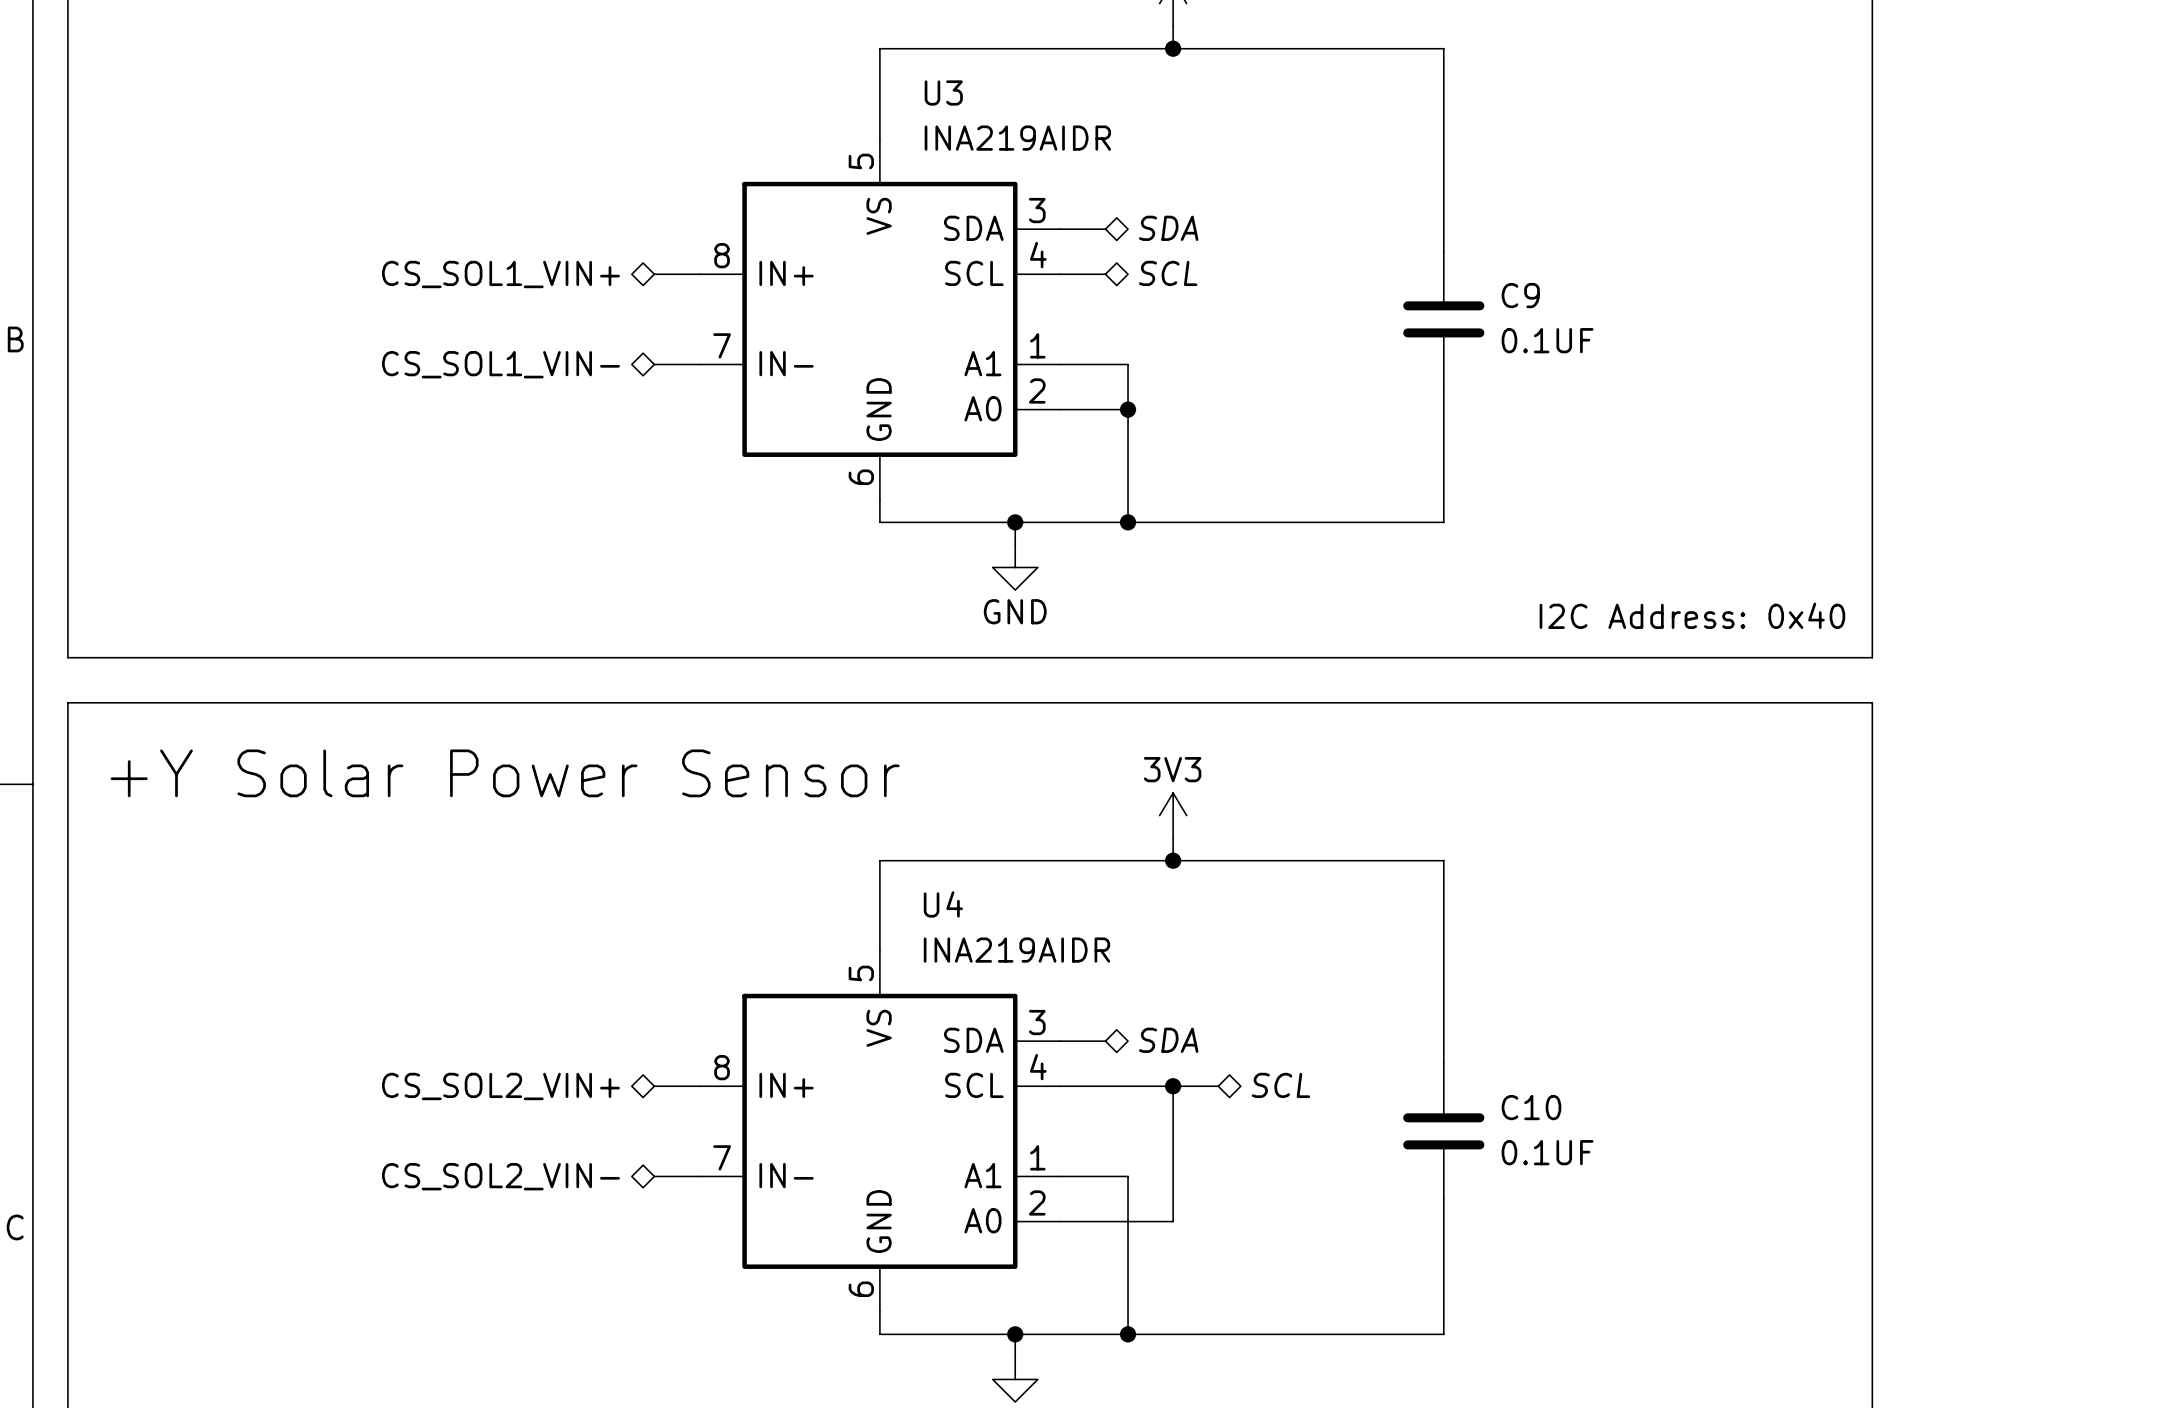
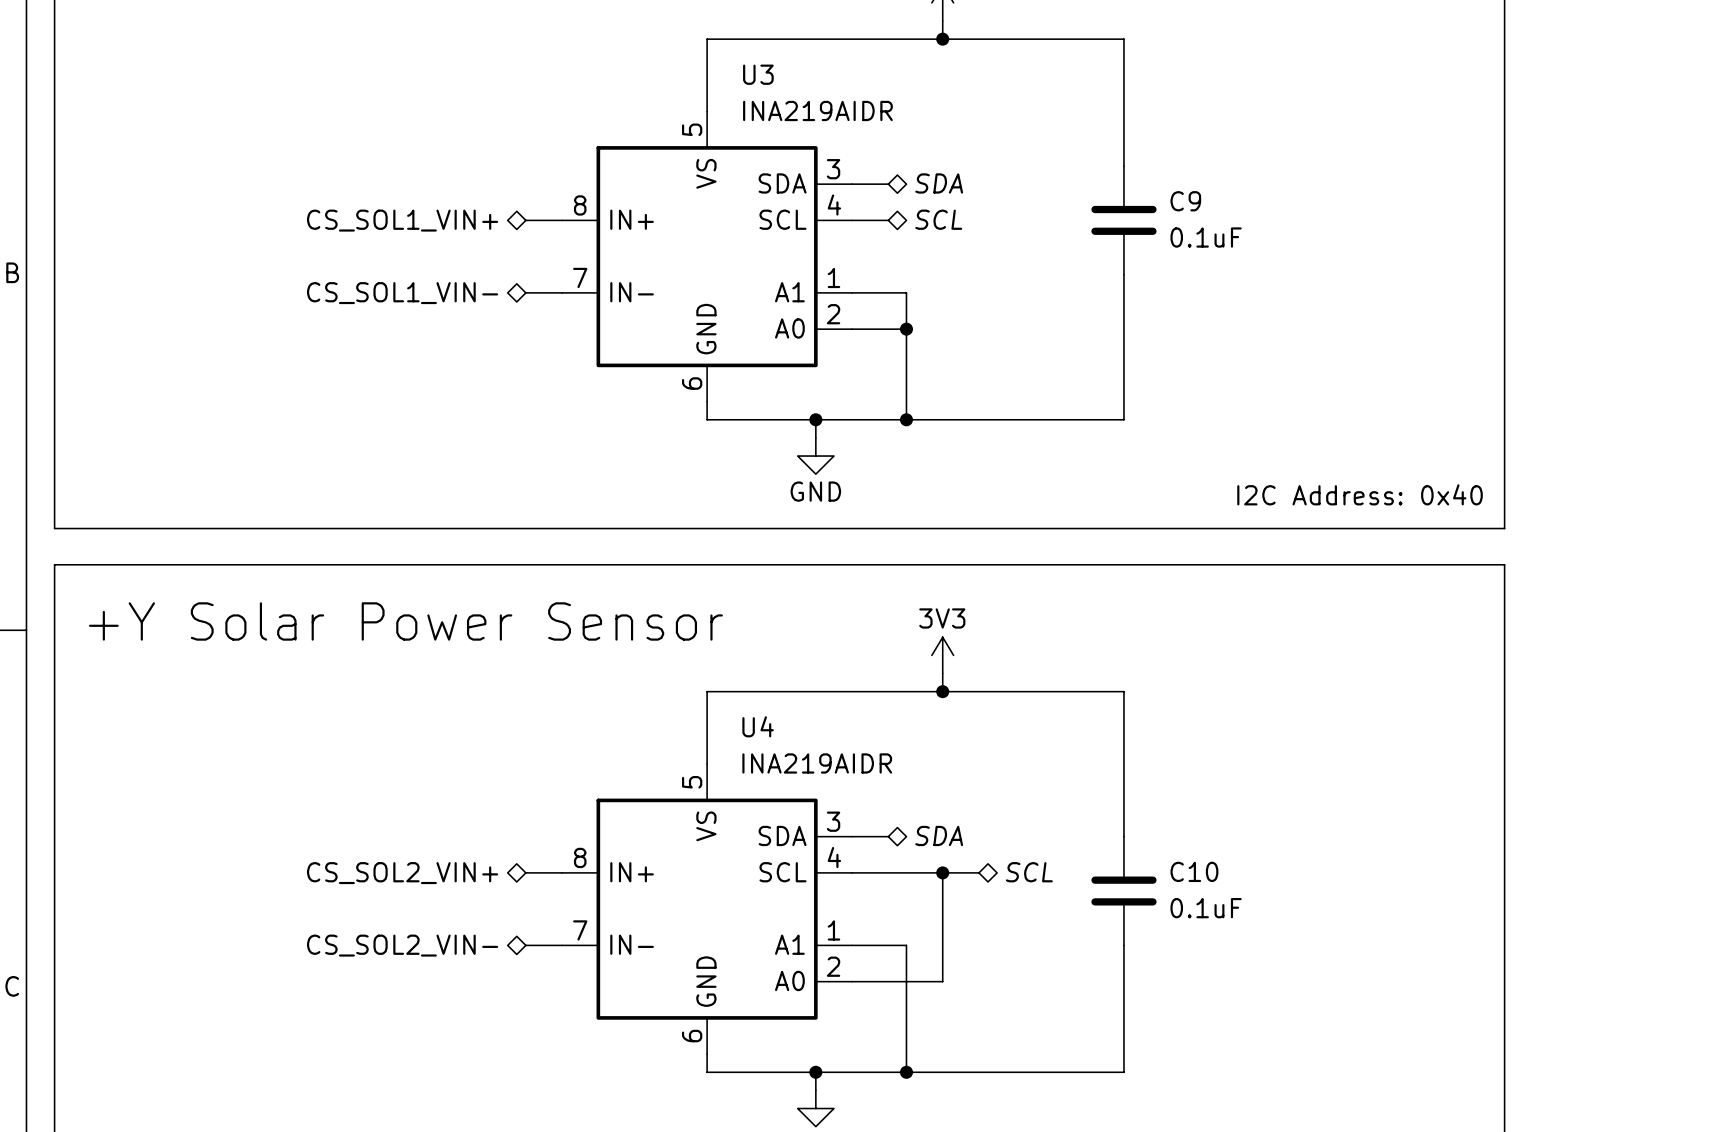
wire: (1398, 48) (1443, 48) (1443, 251) -> (1123, 39) (1123, 166)
C9 position: (1443, 319) -> (1123, 220)
C9 value: 0.1UF (1547, 340) -> 0.1uF (1206, 237)
wire: (1443, 387) (1443, 522) (1398, 522) -> (1123, 274) (1123, 419)
wire: (1398, 860) (1443, 860) (1443, 1063) -> (1123, 691) (1123, 836)
C10 position: (1443, 1131) -> (1123, 891)
C10 value: 0.1UF (1547, 1152) -> 0.1uF (1206, 908)
wire: (1443, 1199) (1443, 1334) (1398, 1334) -> (1123, 945) (1123, 1072)

